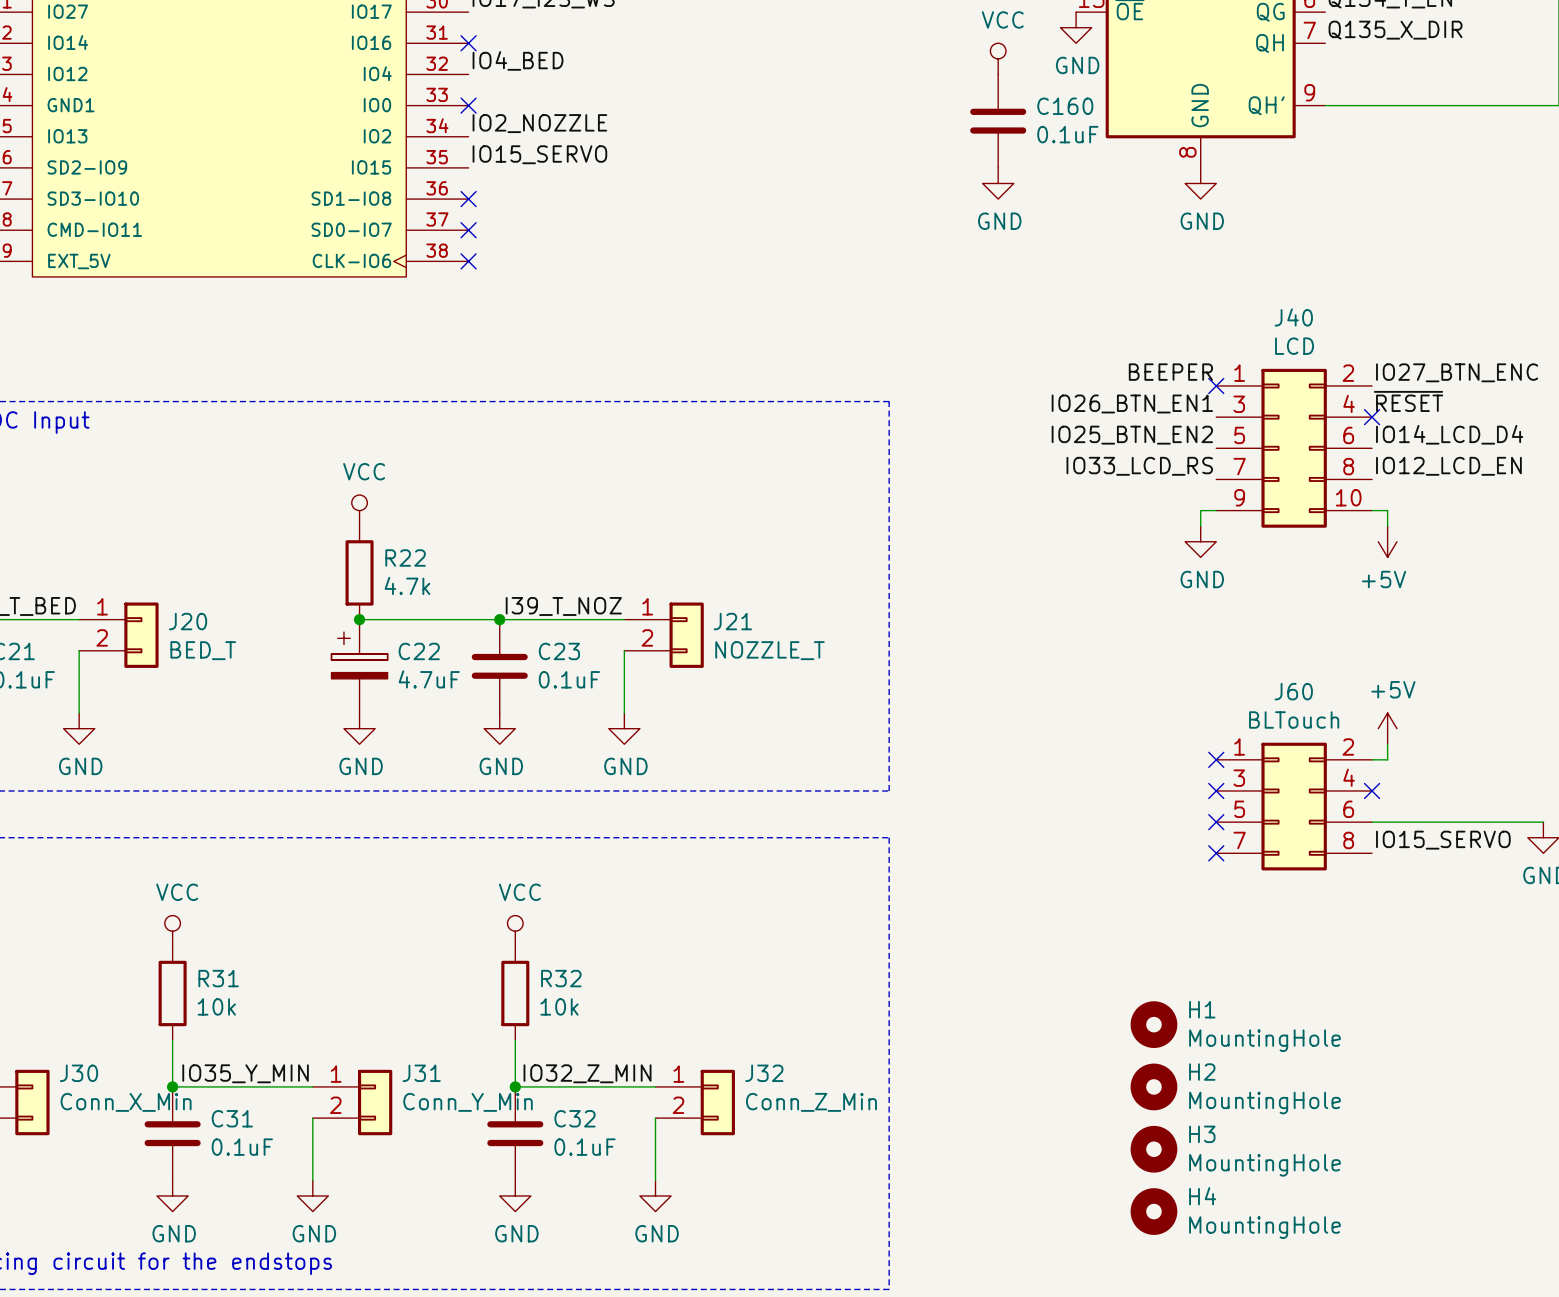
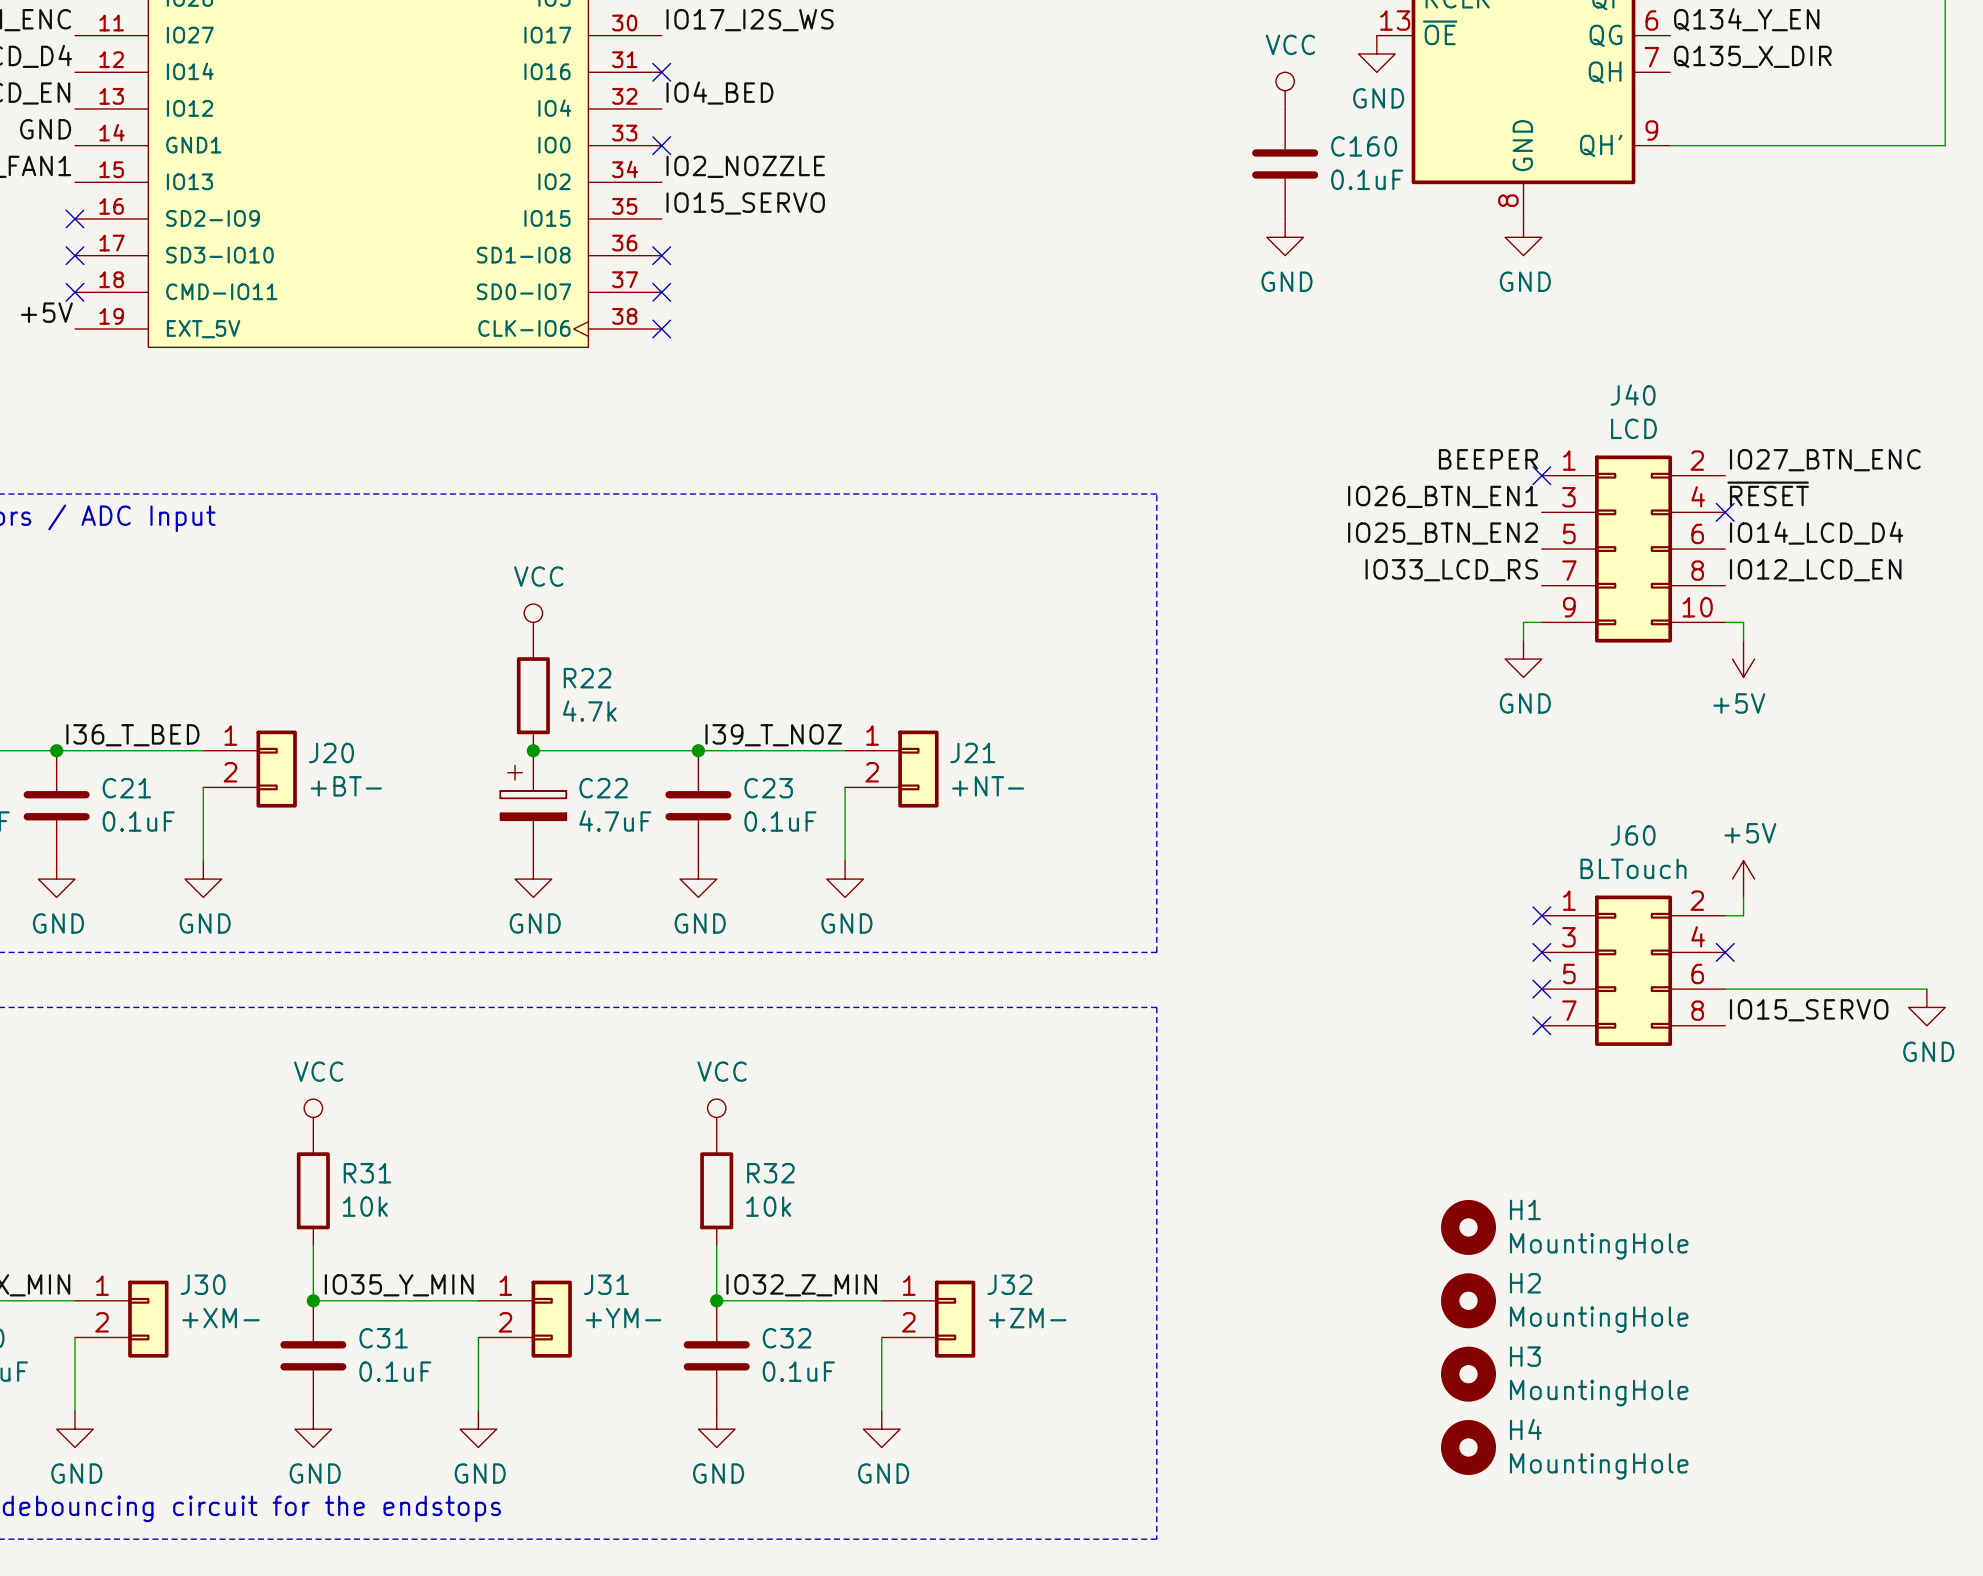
J20 value: BED_T (203, 650) -> +BT- (346, 786)
J21 value: NOZZLE_T (769, 650) -> +NT- (988, 786)
J30 value: Conn_X_Min (126, 1102) -> +XM- (221, 1318)
J31 value: Conn_Y_Min (468, 1102) -> +YM- (623, 1318)
J32 value: Conn_Z_Min (811, 1102) -> +ZM- (1027, 1318)

